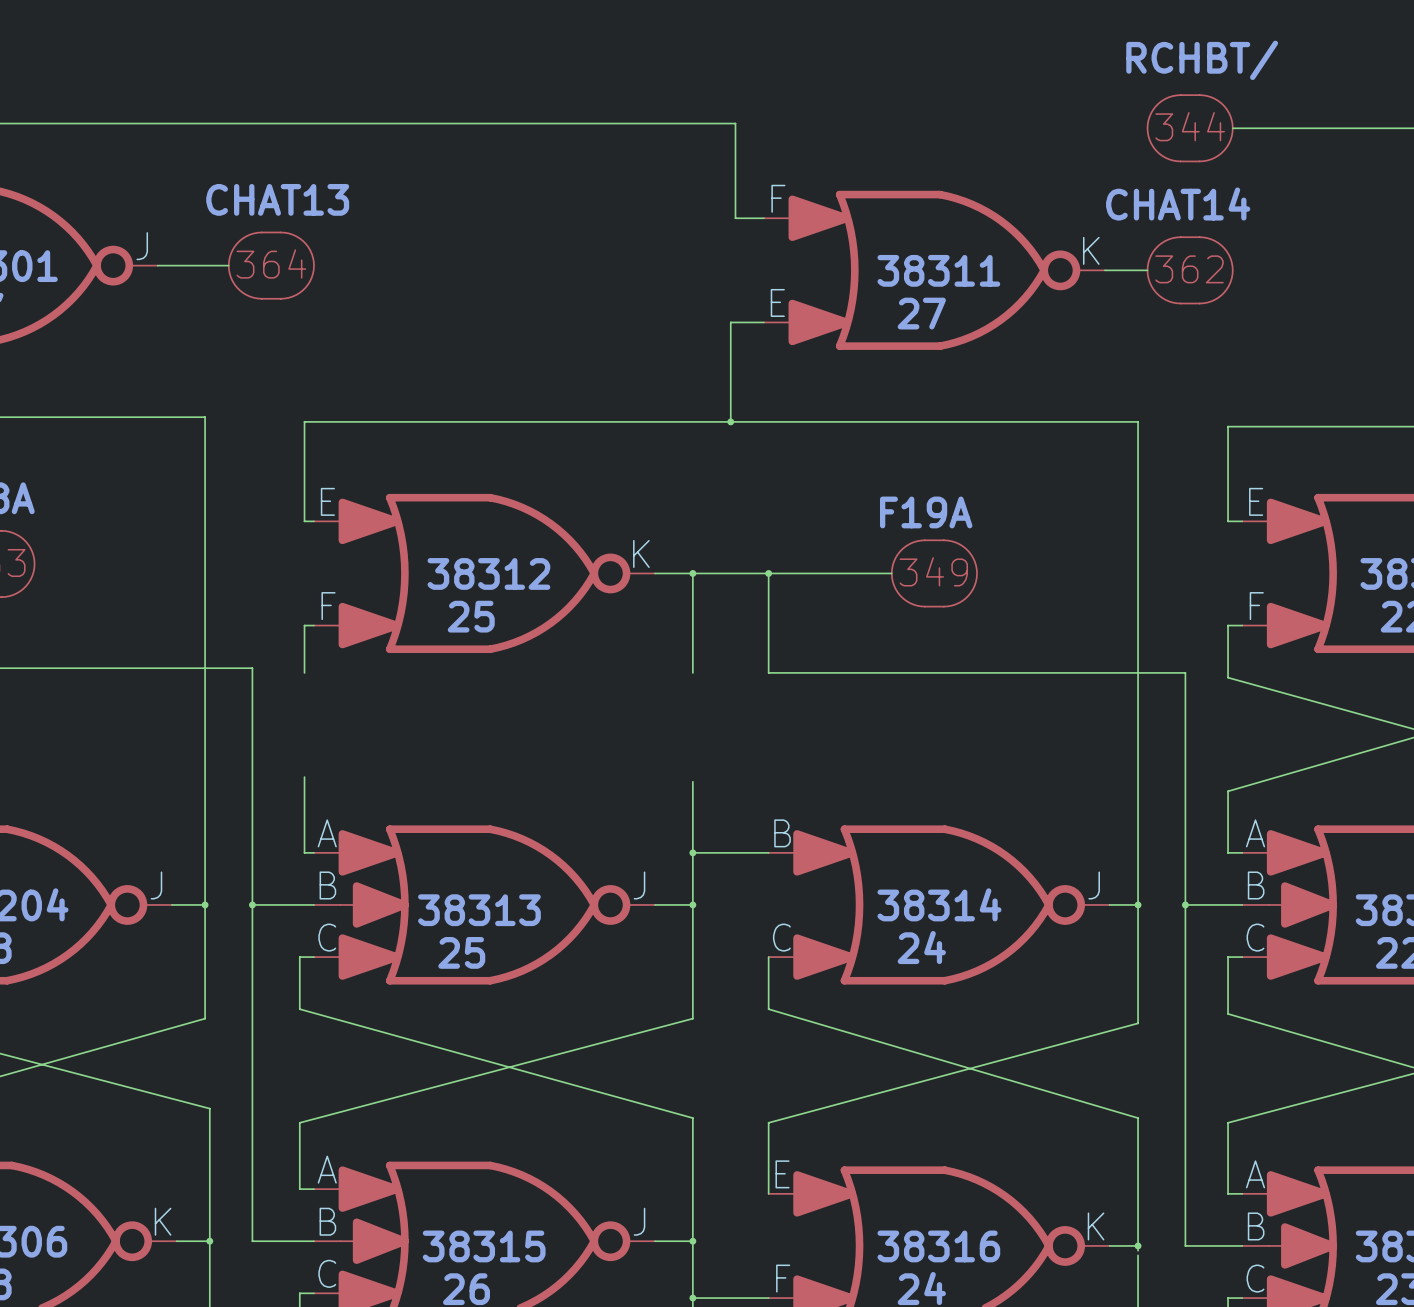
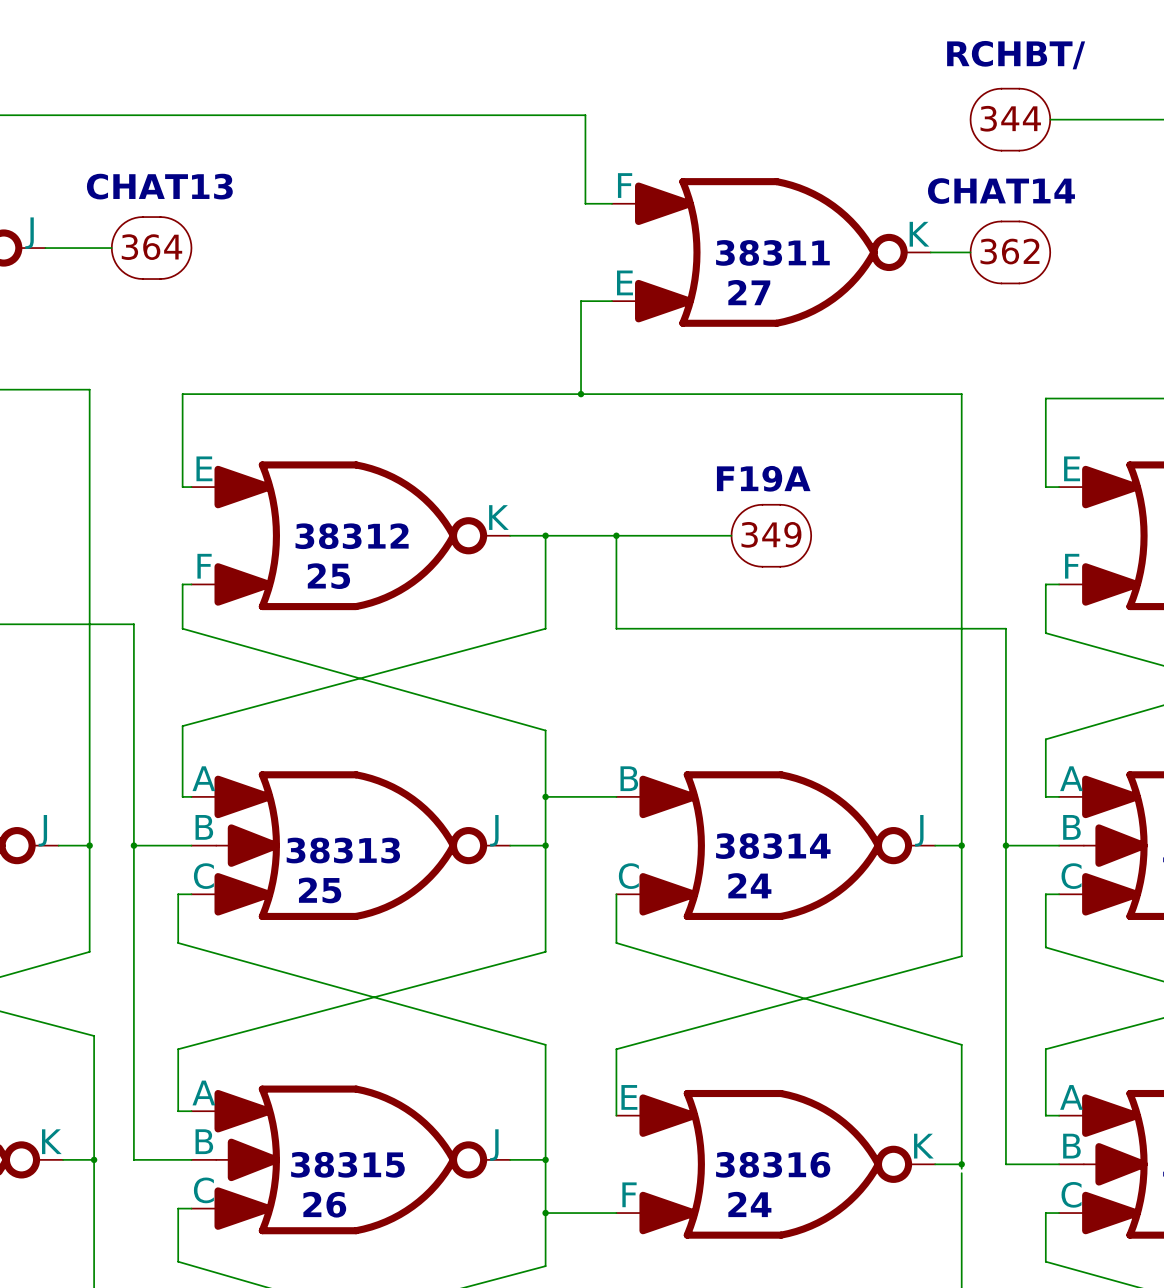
wire: none -> (182, 628) (545, 730)
wire: none -> (545, 628) (182, 726)

